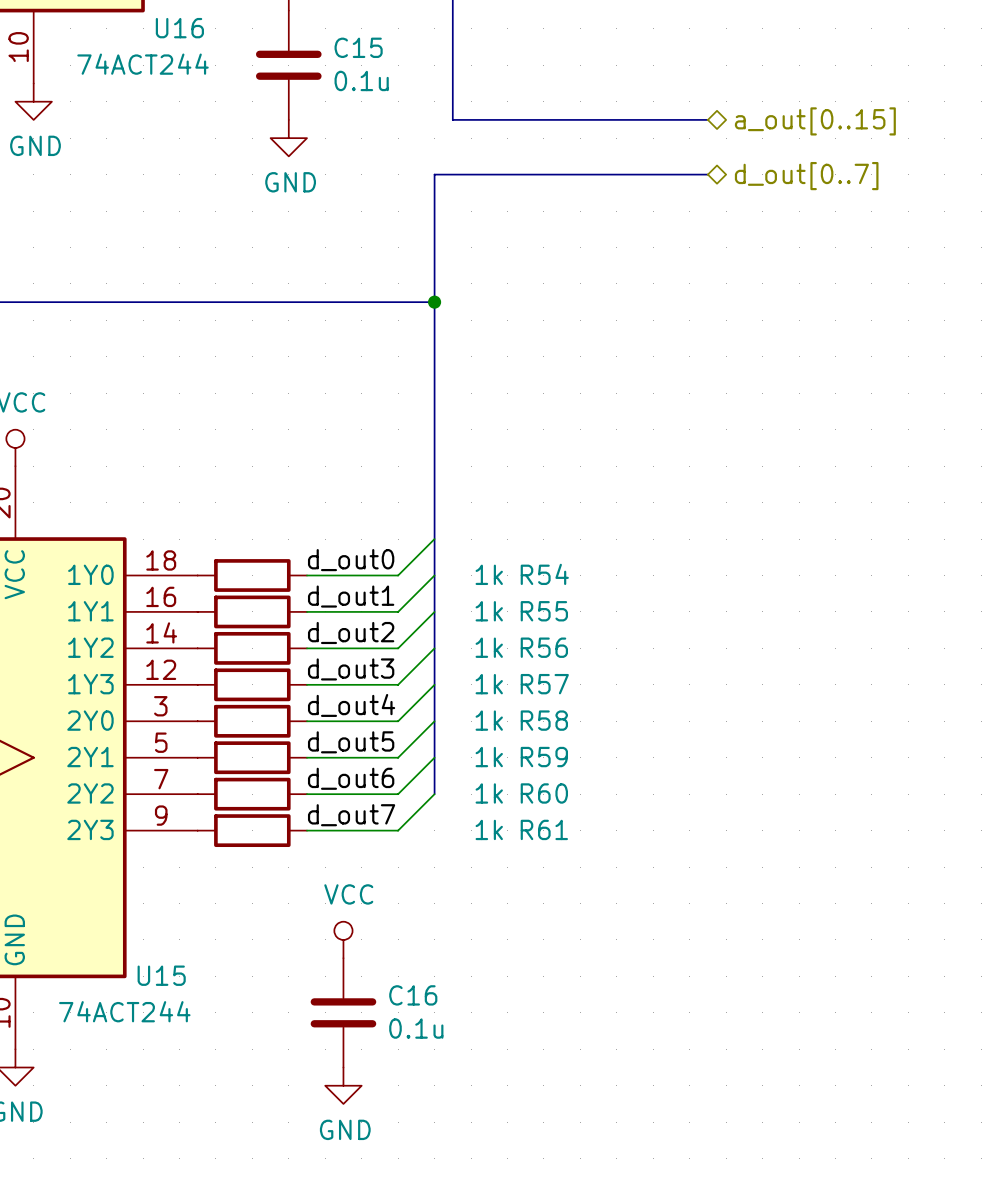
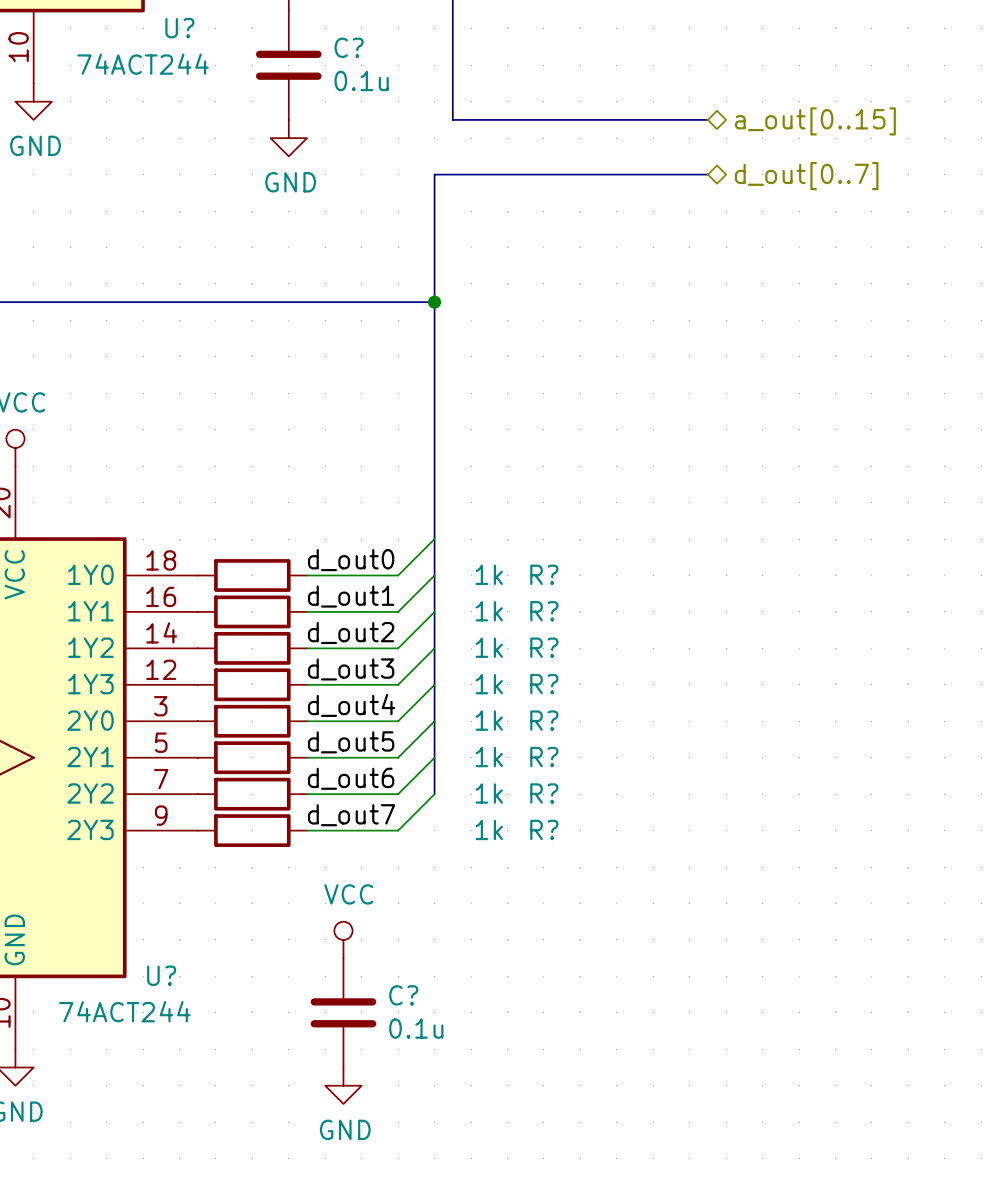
U16 name: U16 (179, 28) -> U? (179, 28)
C15 name: C15 (358, 47) -> C? (349, 47)
R54 name: R54 (544, 574) -> R? (544, 574)
R55 name: R55 (544, 611) -> R? (544, 611)
R56 name: R56 (544, 647) -> R? (544, 647)
R57 name: R57 (544, 684) -> R? (544, 684)
R58 name: R58 (544, 720) -> R? (544, 720)
R59 name: R59 (544, 757) -> R? (544, 757)
R60 name: R60 (544, 793) -> R? (544, 793)
R61 name: R61 (544, 829) -> R? (544, 829)
U15 name: U15 (161, 975) -> U? (161, 975)
C16 name: C16 (413, 995) -> C? (403, 995)

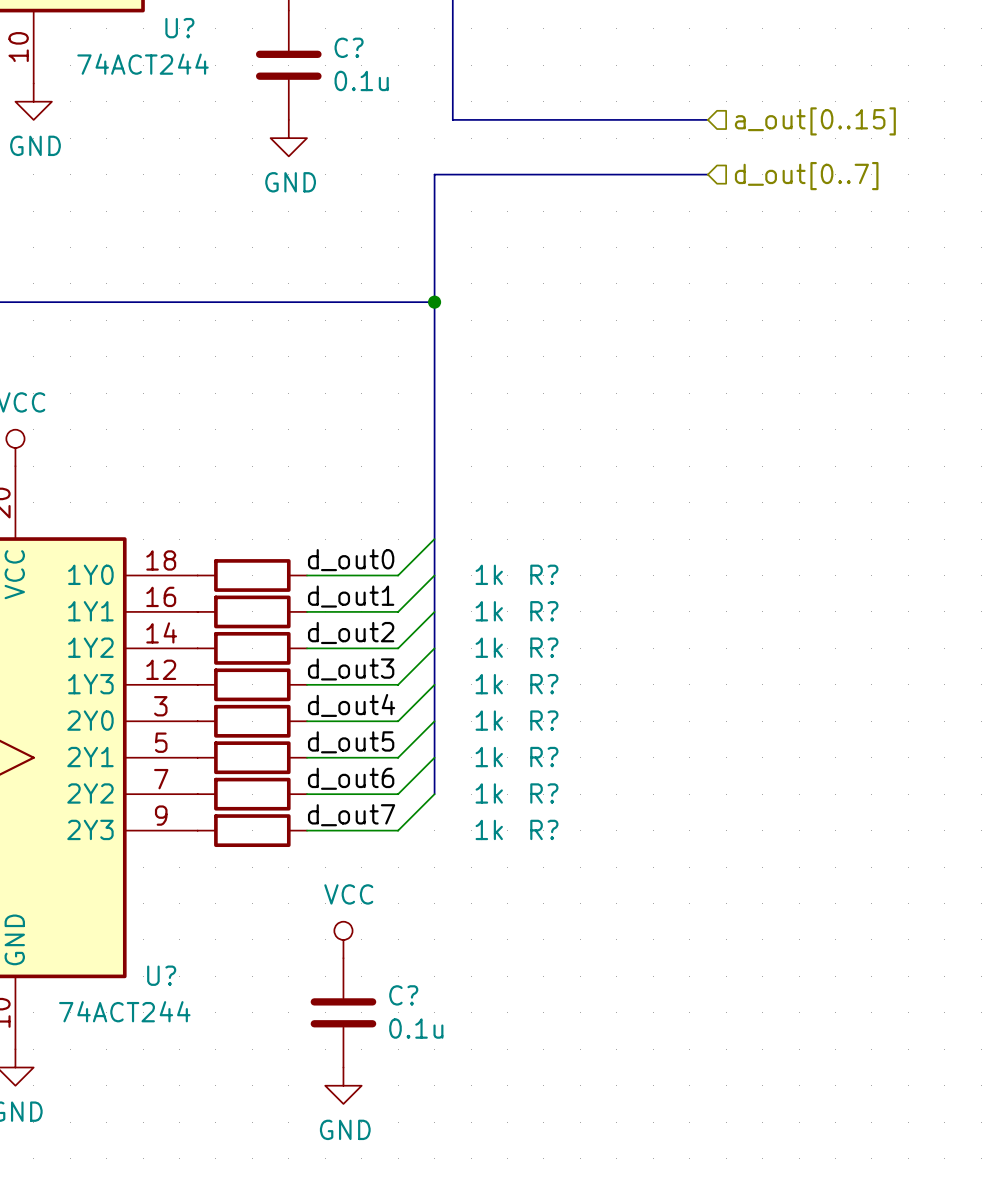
hierarchical label shape: bidirectional (815, 121) -> input (815, 121)
hierarchical label shape: bidirectional (806, 176) -> input (806, 176)

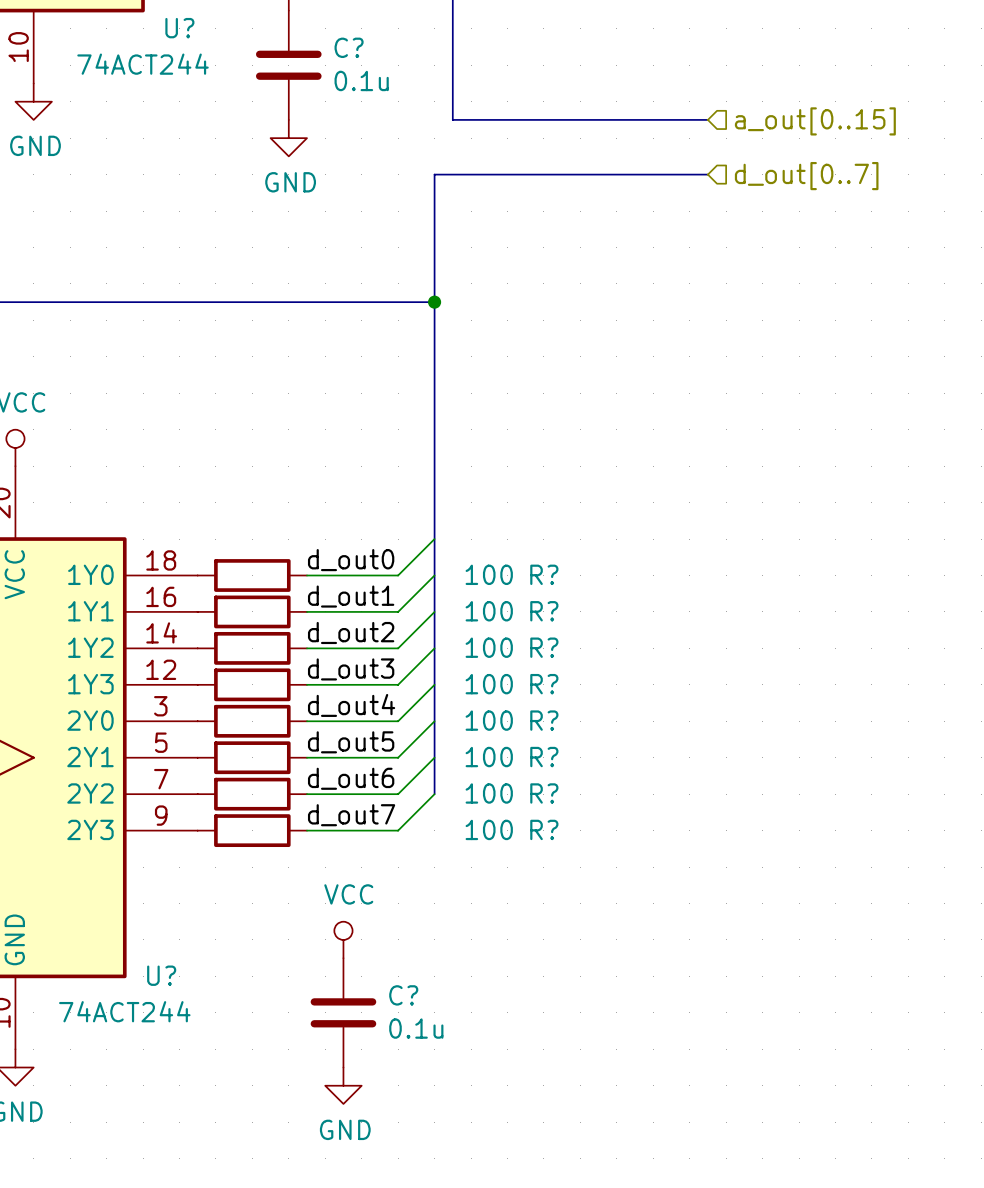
R? value: 1k (489, 574) -> 100 (489, 574)
R? value: 1k (489, 611) -> 100 (489, 611)
R? value: 1k (489, 647) -> 100 (489, 647)
R? value: 1k (489, 684) -> 100 (489, 684)
R? value: 1k (489, 720) -> 100 (489, 720)
R? value: 1k (489, 757) -> 100 (489, 757)
R? value: 1k (489, 793) -> 100 (489, 793)
R? value: 1k (489, 829) -> 100 (489, 829)

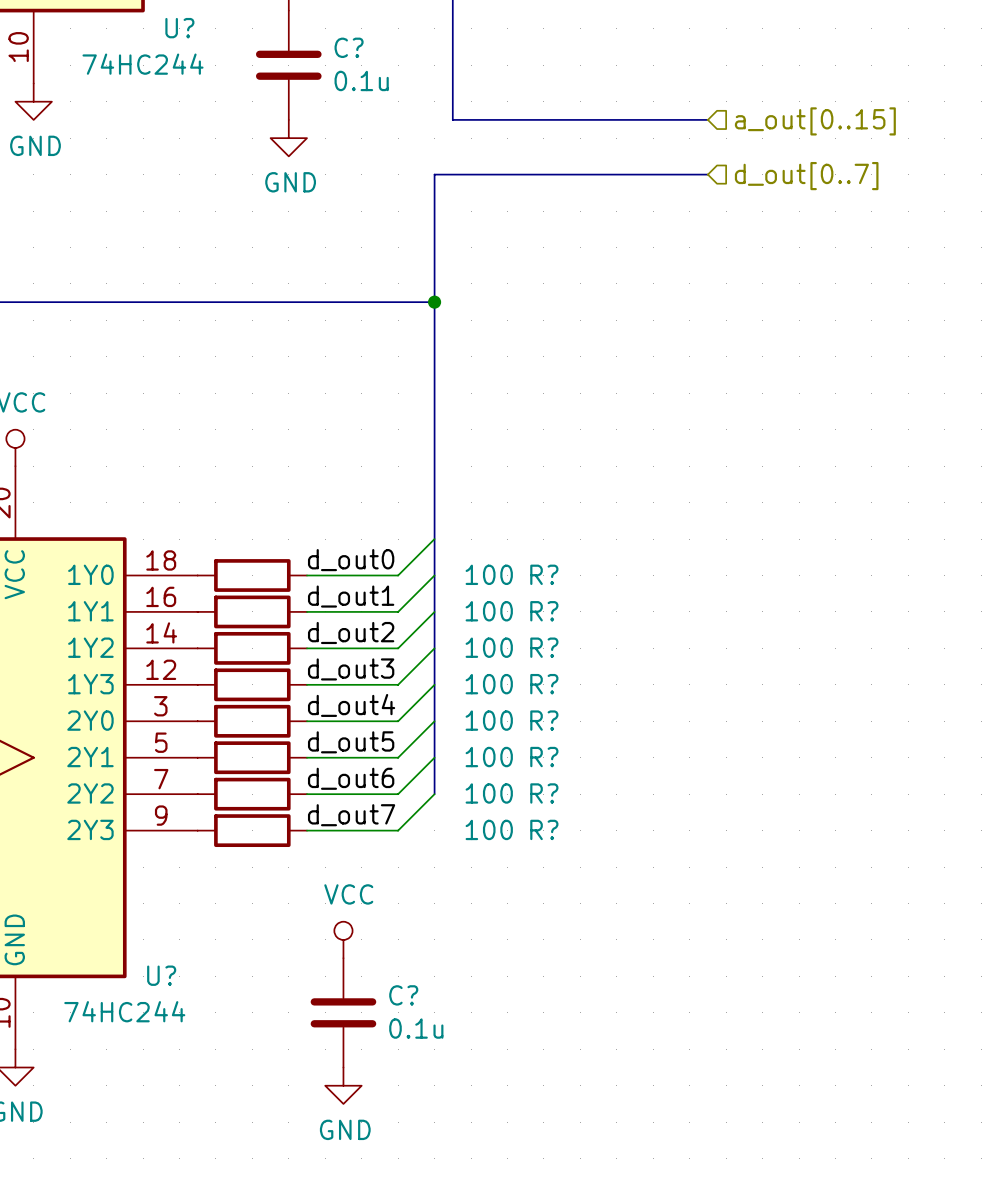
U? value: 74ACT244 (143, 64) -> 74HC244 (143, 64)
U? value: 74ACT244 (124, 1011) -> 74HC244 (124, 1011)

